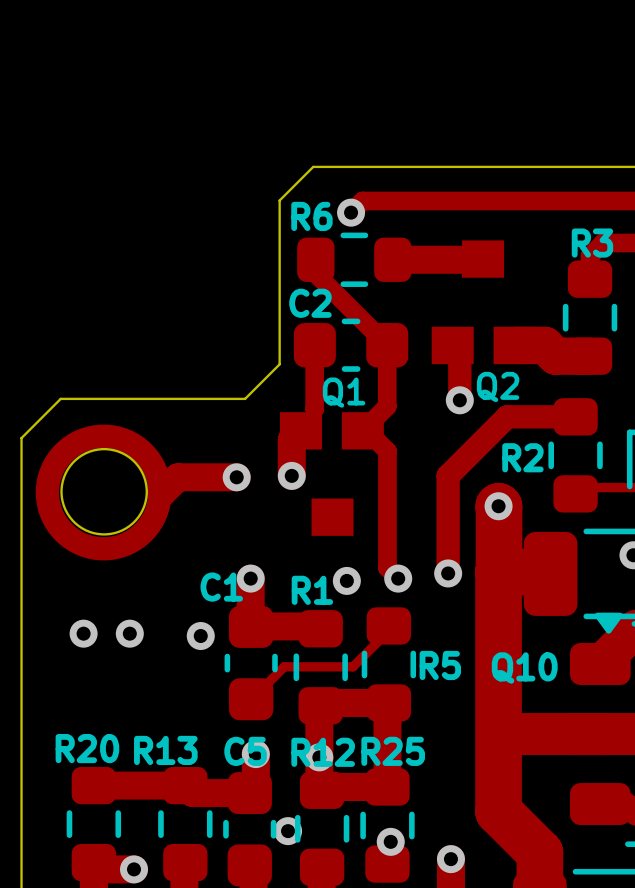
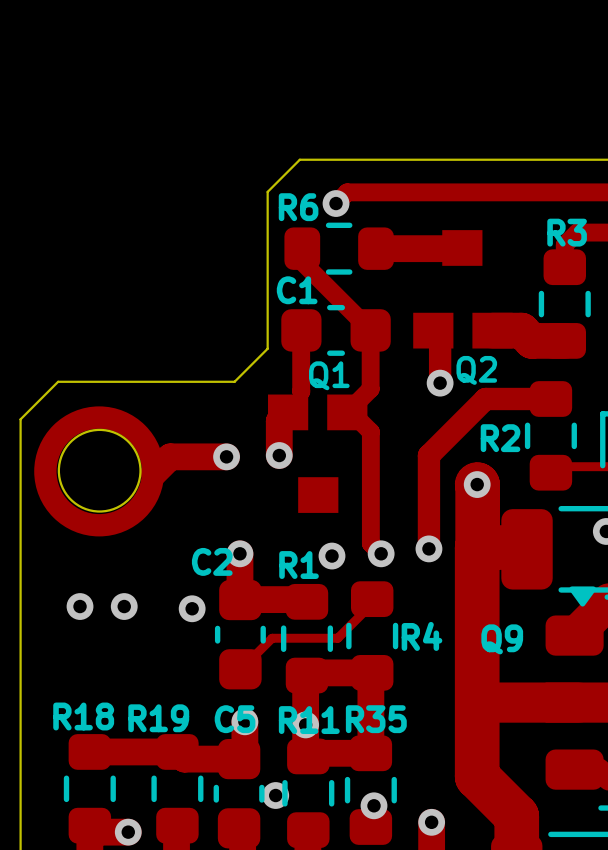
C2 name: C2 (310, 303) -> C1 (297, 290)
C1 name: C1 (221, 587) -> C2 (212, 561)
R5 name: R5 (440, 665) -> R4 (421, 636)
Q10 name: Q10 (524, 667) -> Q9 (502, 639)
R20 name: R20 (87, 748) -> R18 (83, 716)
R13 name: R13 (165, 750) -> R19 (158, 718)
R25 name: R25 (393, 751) -> R35 (376, 719)
R12 name: R12 (323, 752) -> R11 (309, 720)

